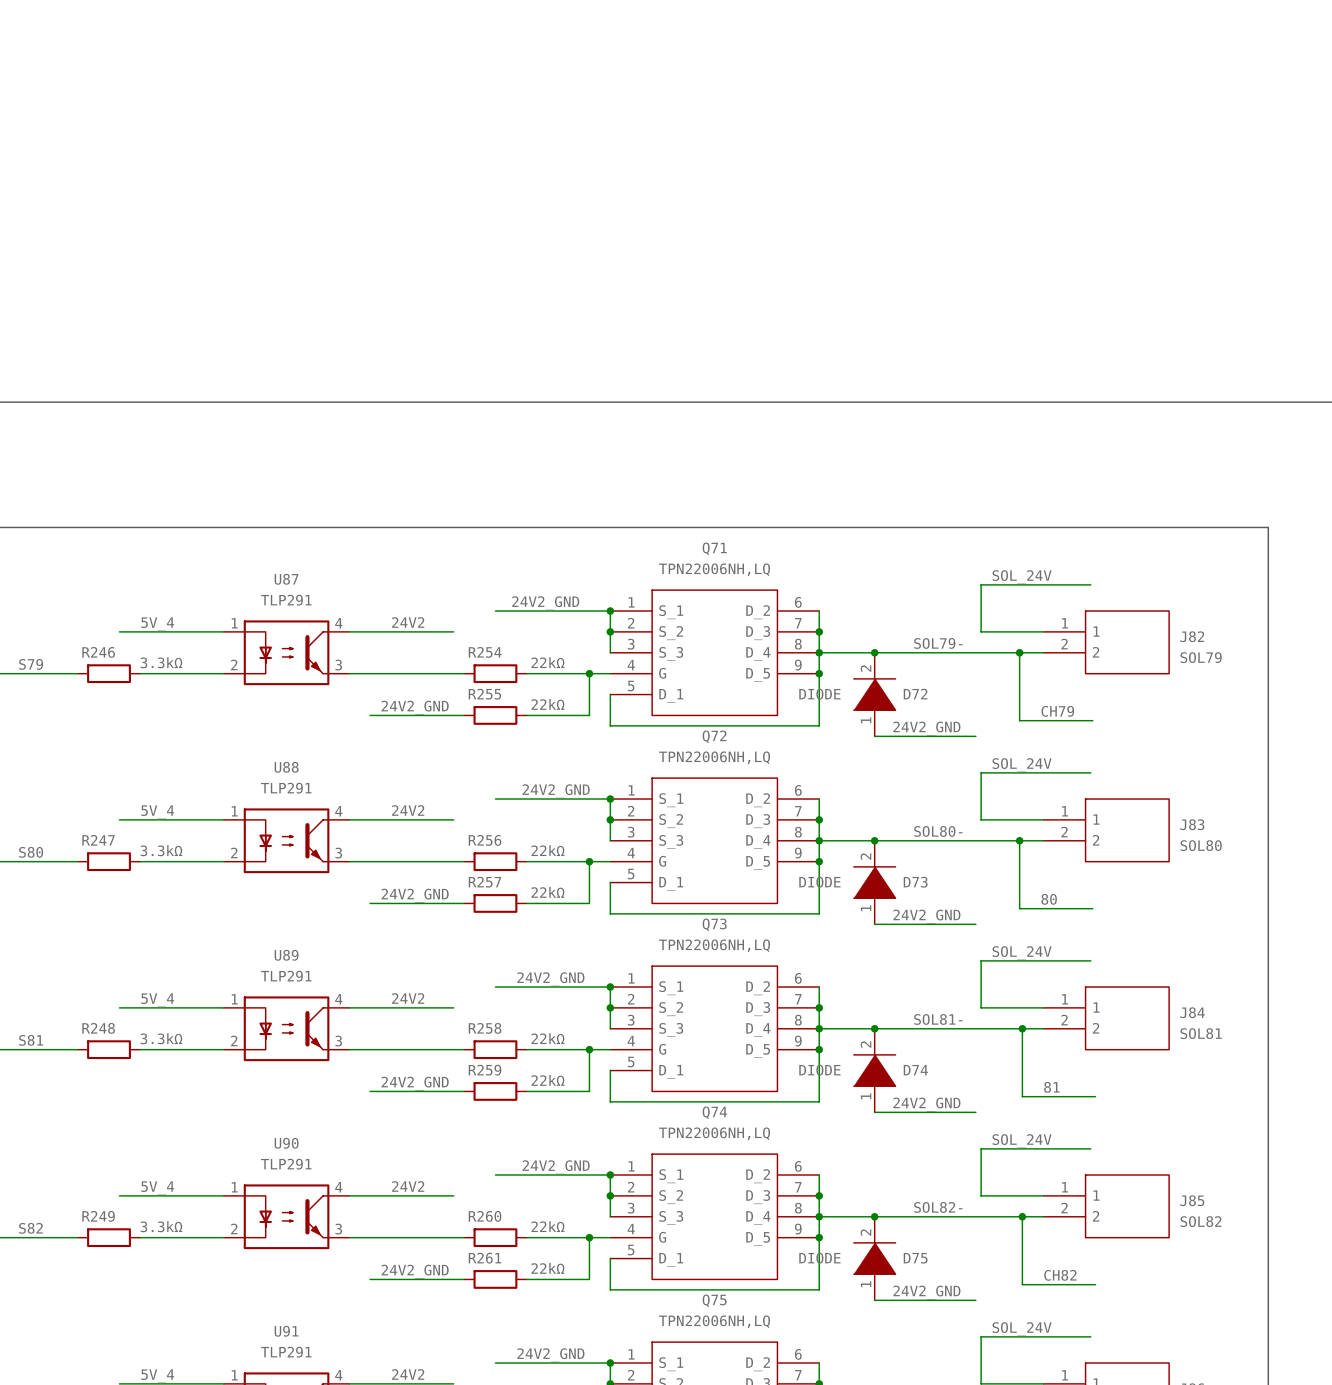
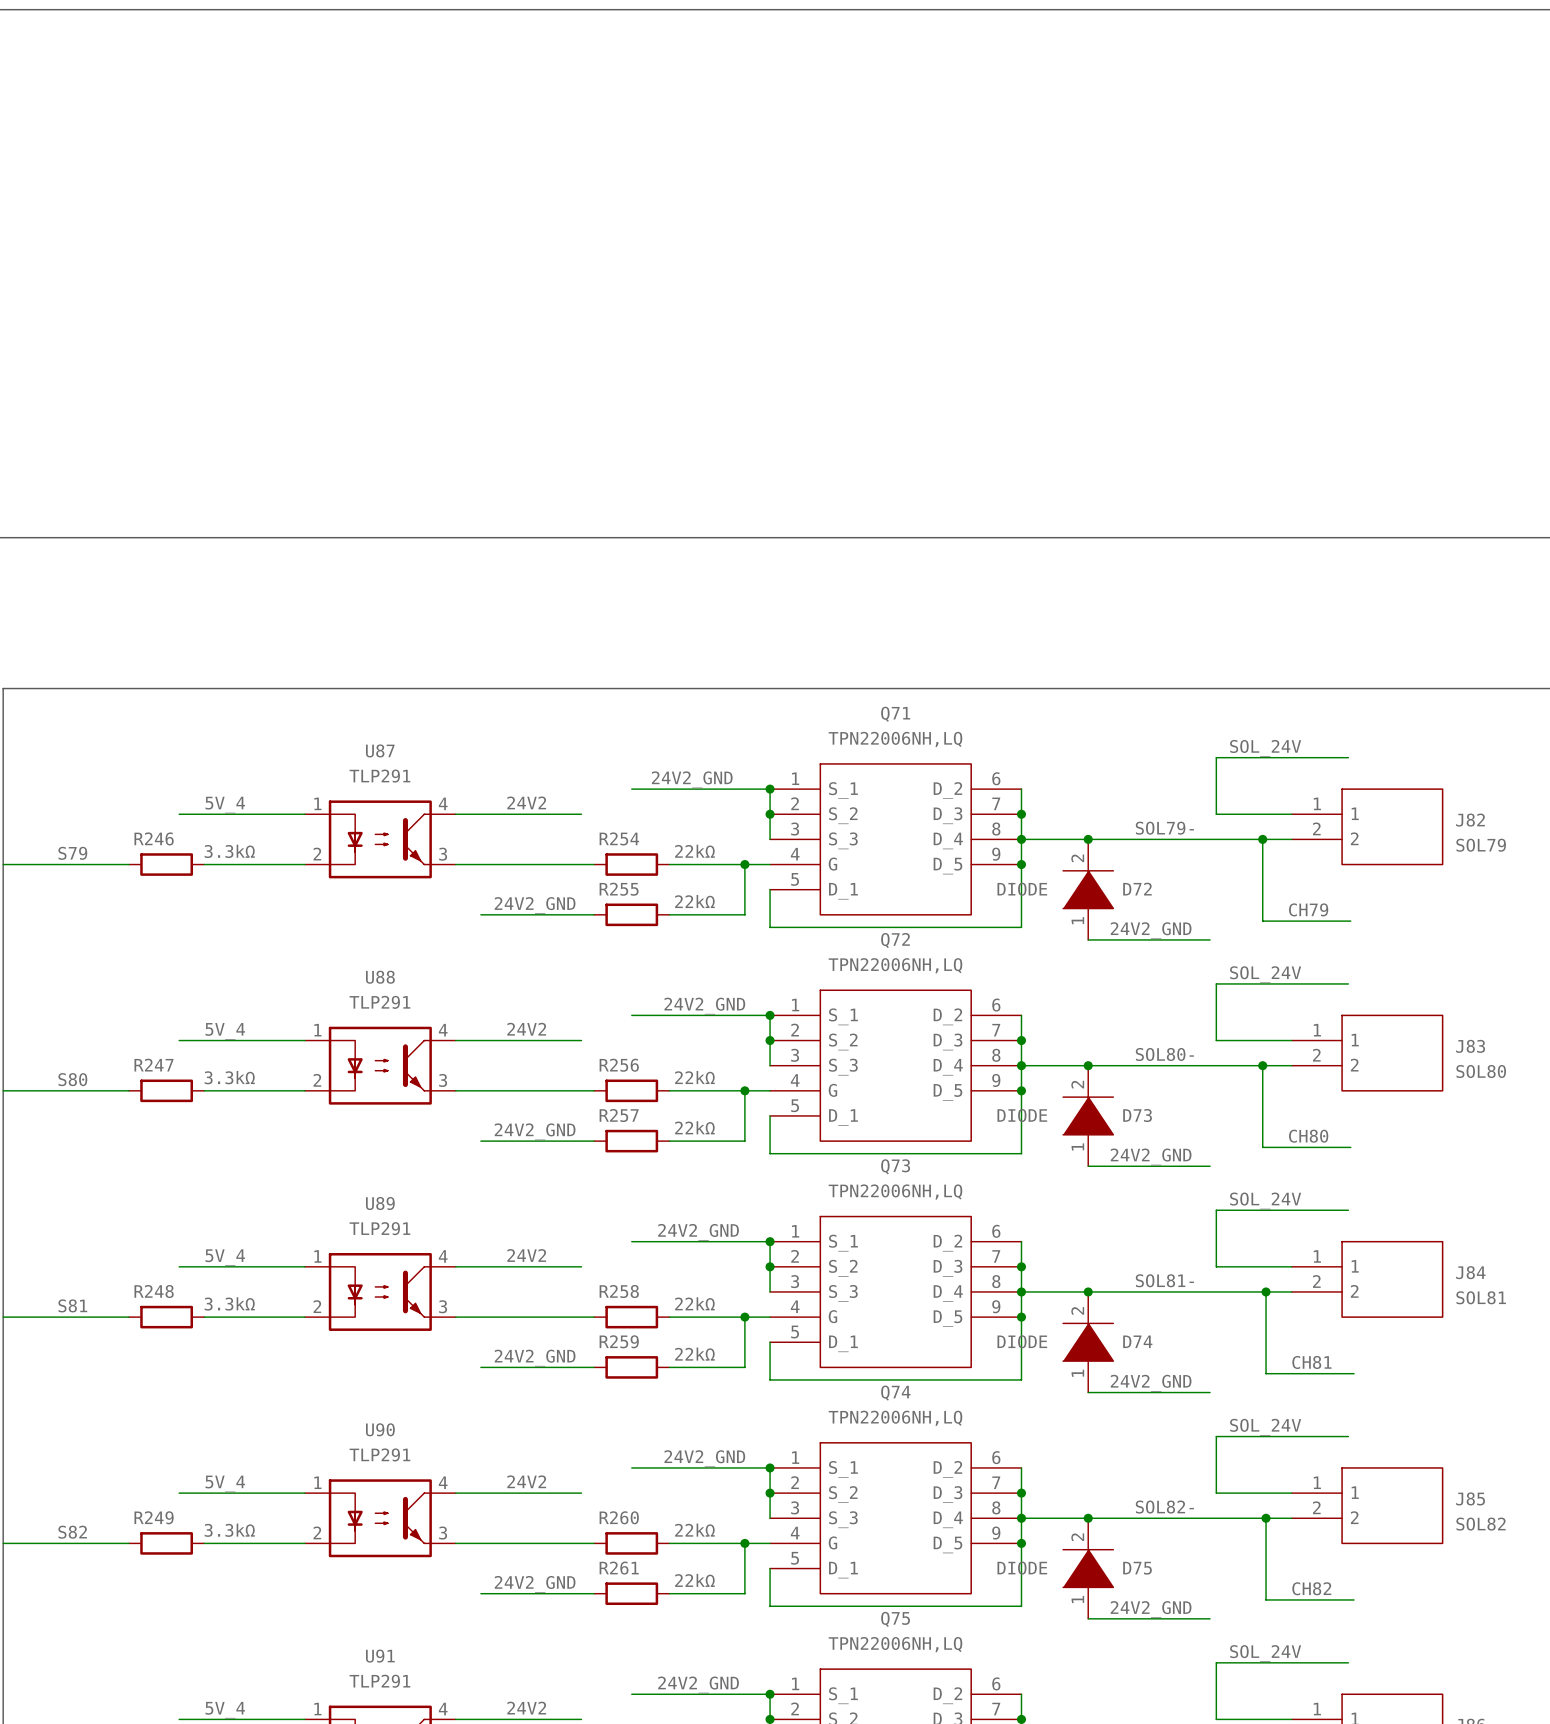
label: 80 (1049, 899) -> CH80 (1308, 1136)
label: 81 (1051, 1087) -> CH81 (1311, 1362)

